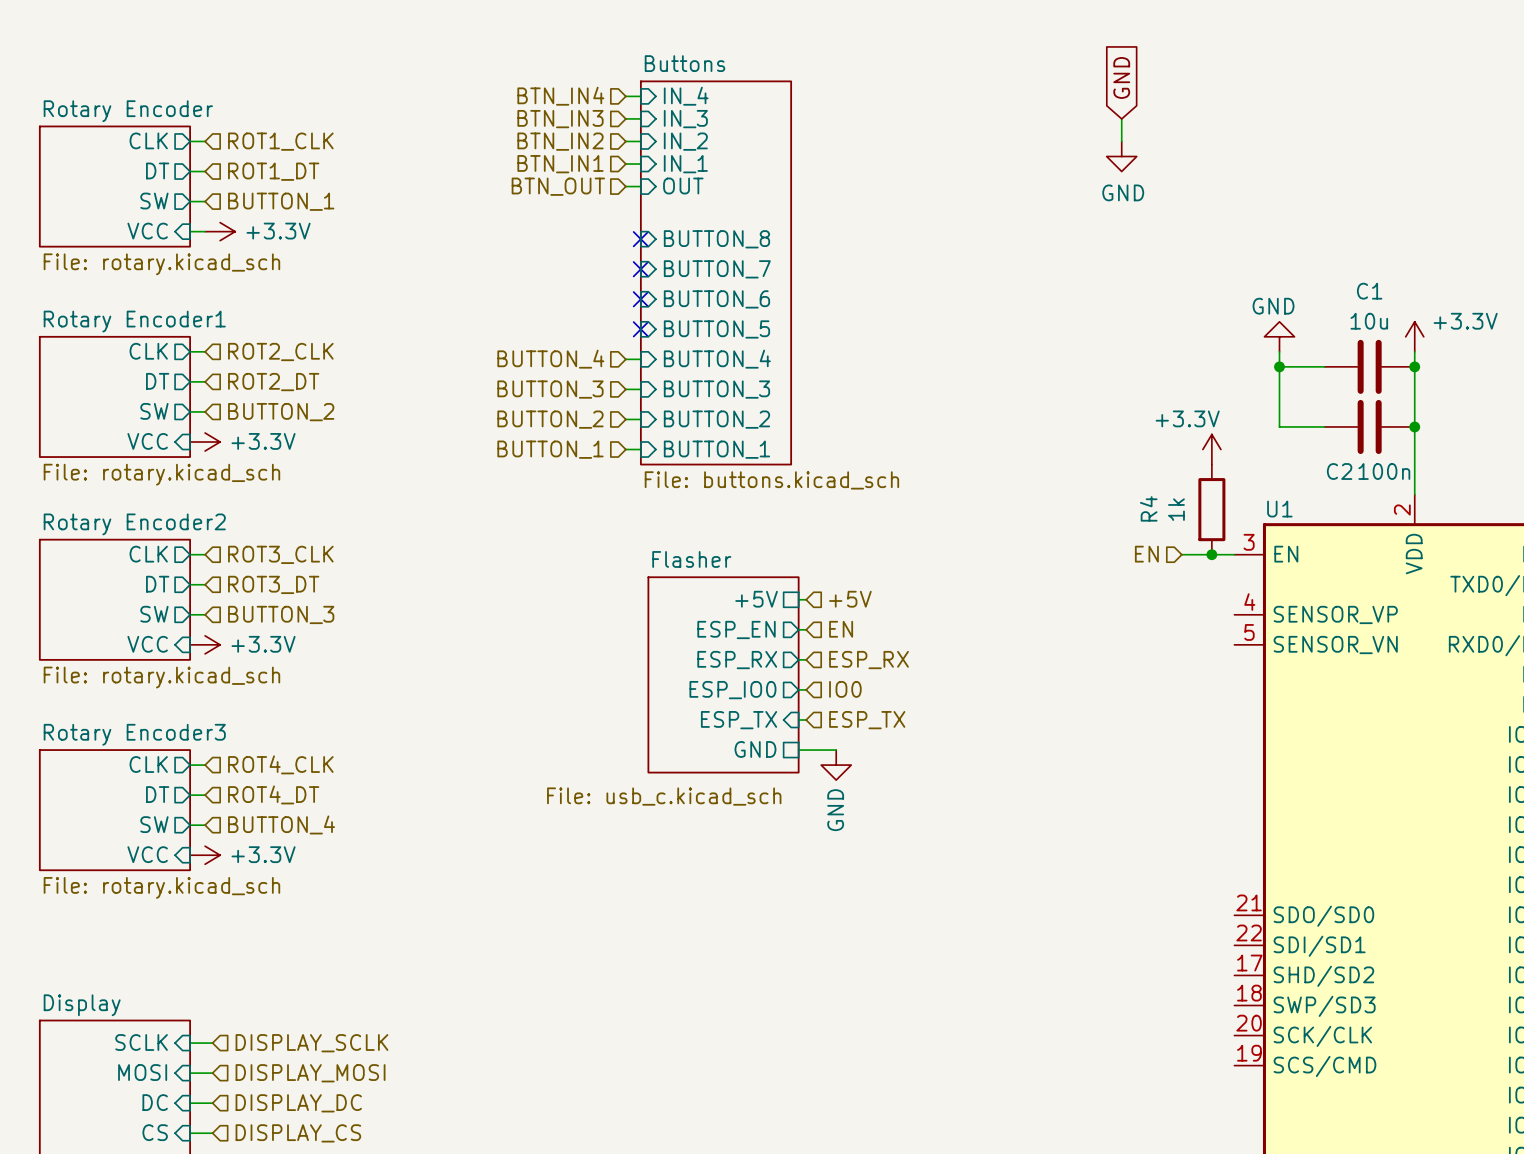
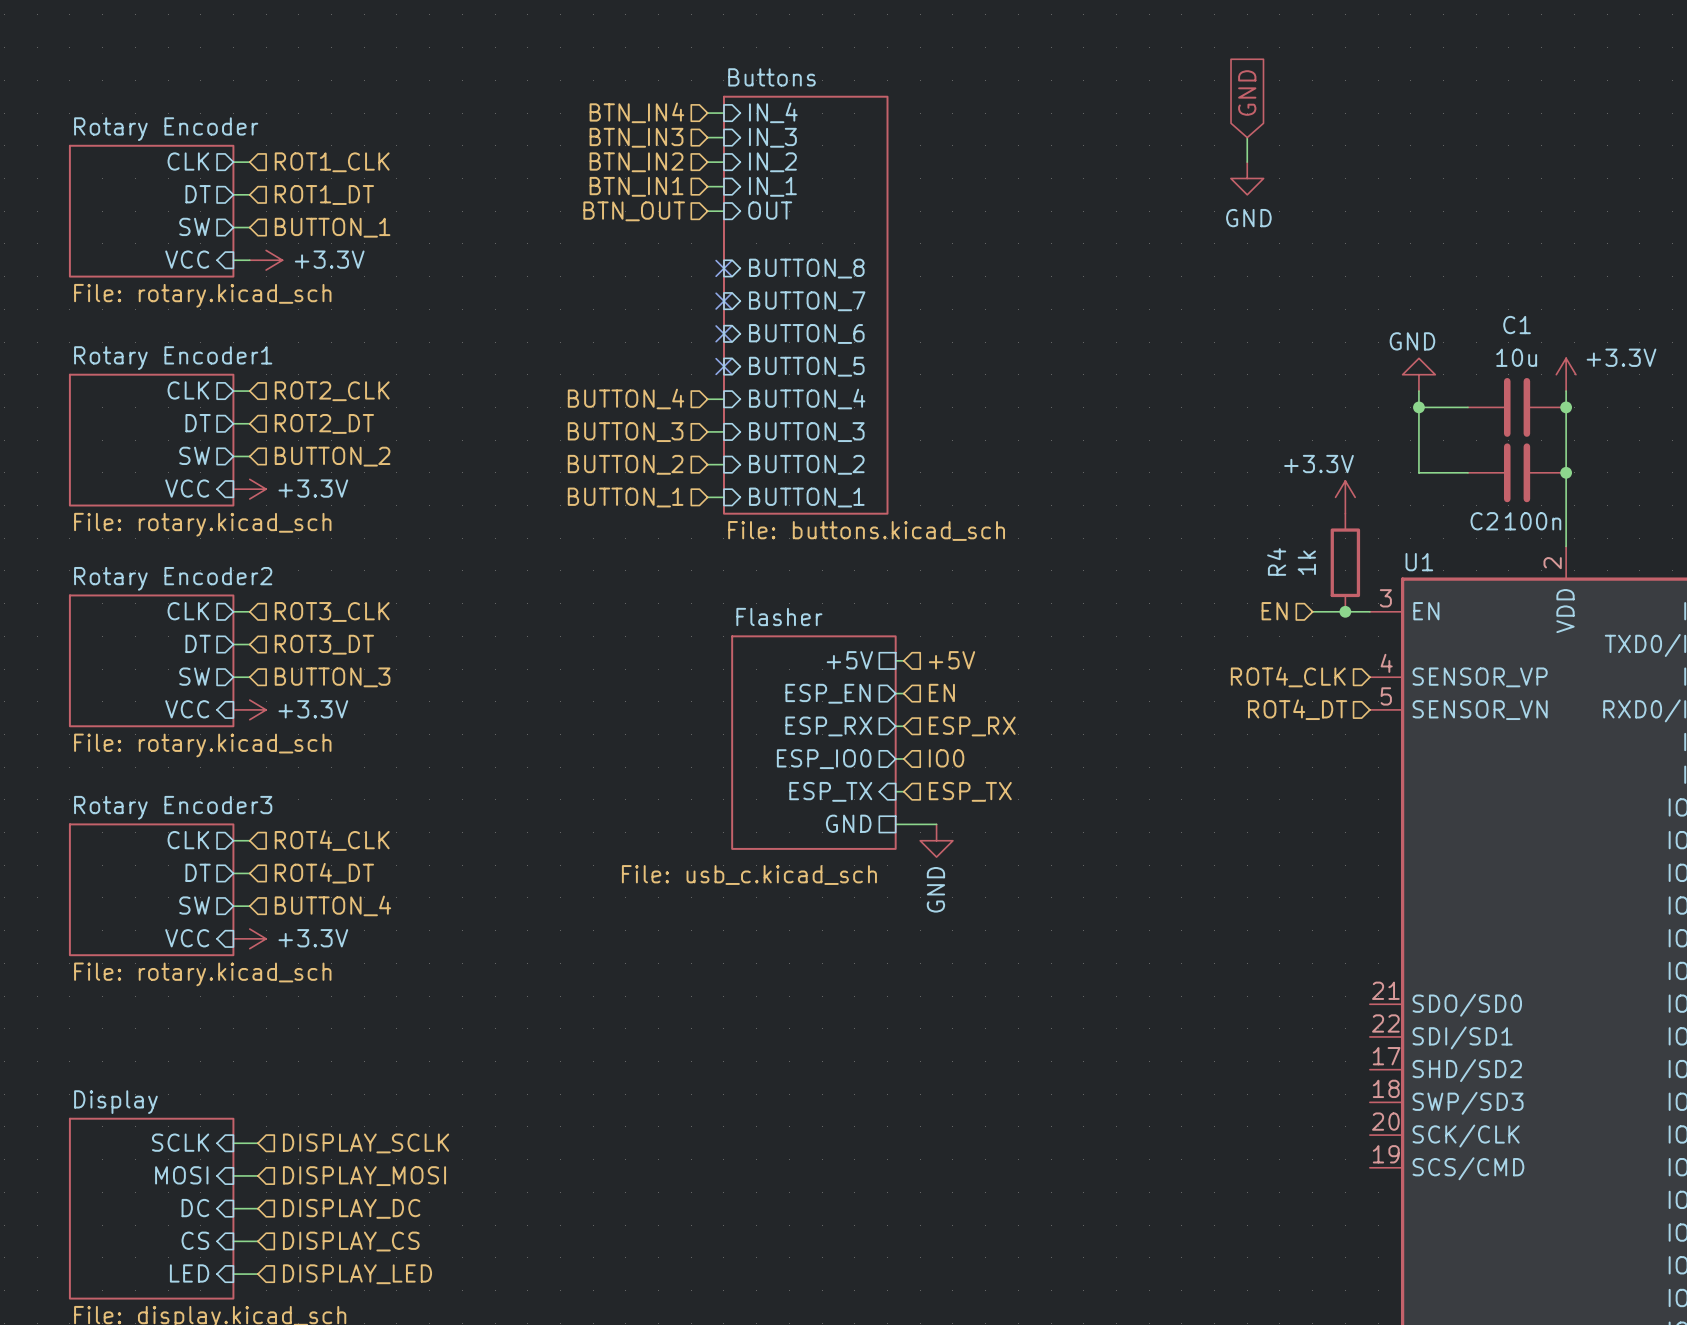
hierarchical label: none -> ROT4_CLK (1288, 677)
hierarchical label: none -> ROT4_DT (1297, 709)

